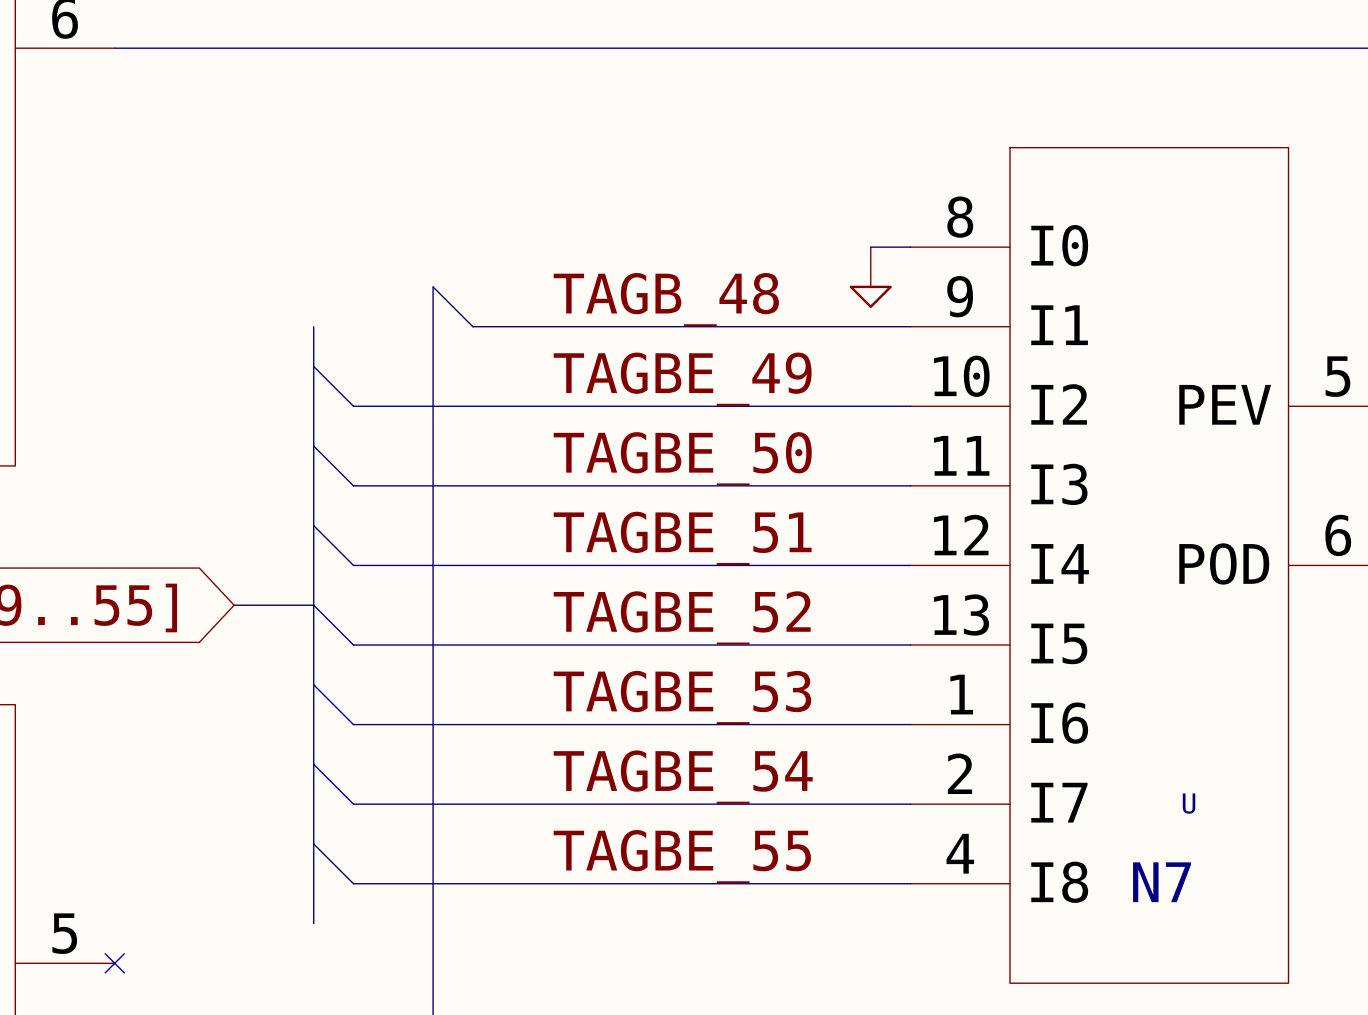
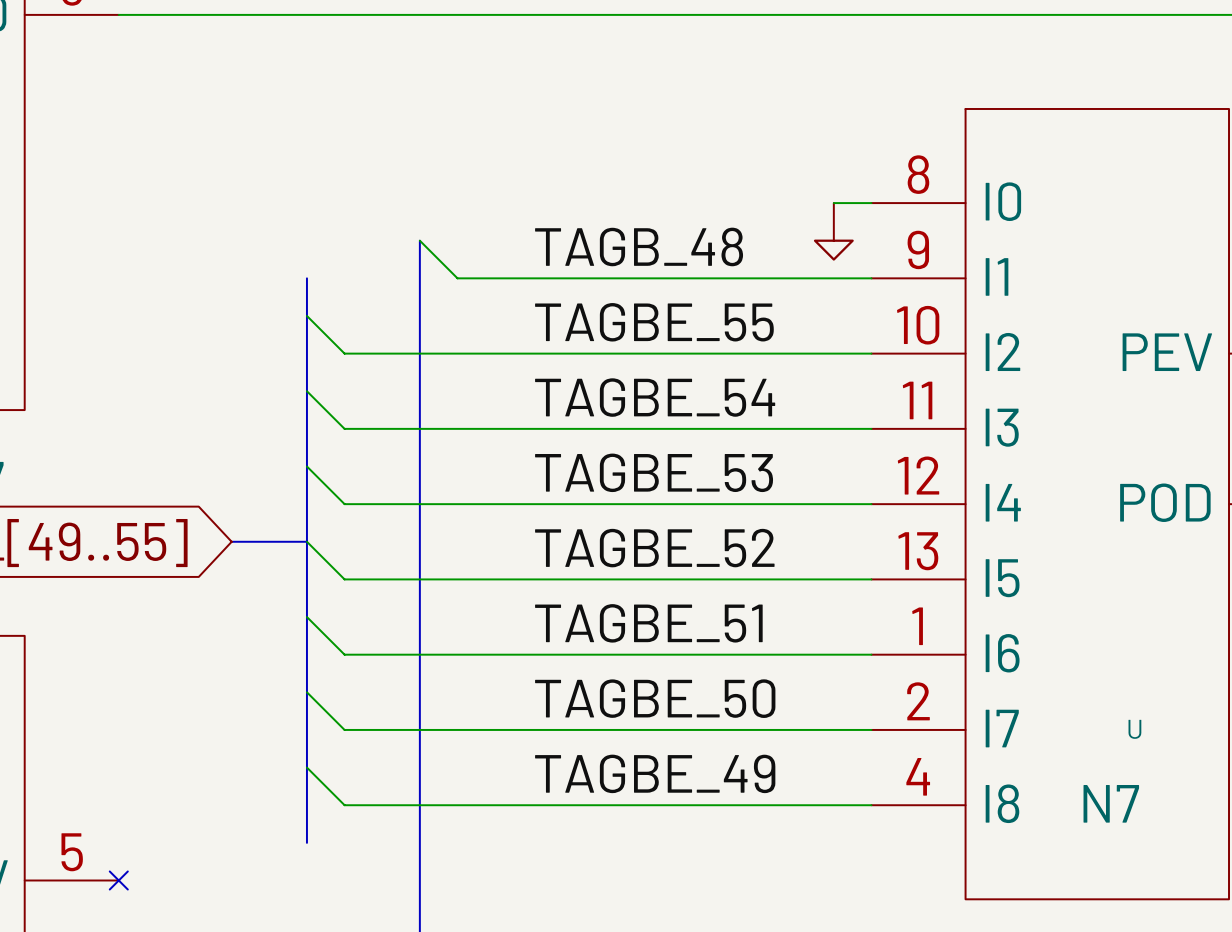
label: TAGBE_49 (682, 379) -> TAGBE_55 (654, 322)
label: TAGBE_50 (682, 458) -> TAGBE_54 (655, 397)
label: TAGBE_51 (682, 538) -> TAGBE_53 (654, 472)
label: TAGBE_53 (682, 697) -> TAGBE_51 (648, 623)
label: TAGBE_54 (683, 777) -> TAGBE_50 (655, 698)
label: TAGBE_55 (682, 856) -> TAGBE_49 (655, 773)

